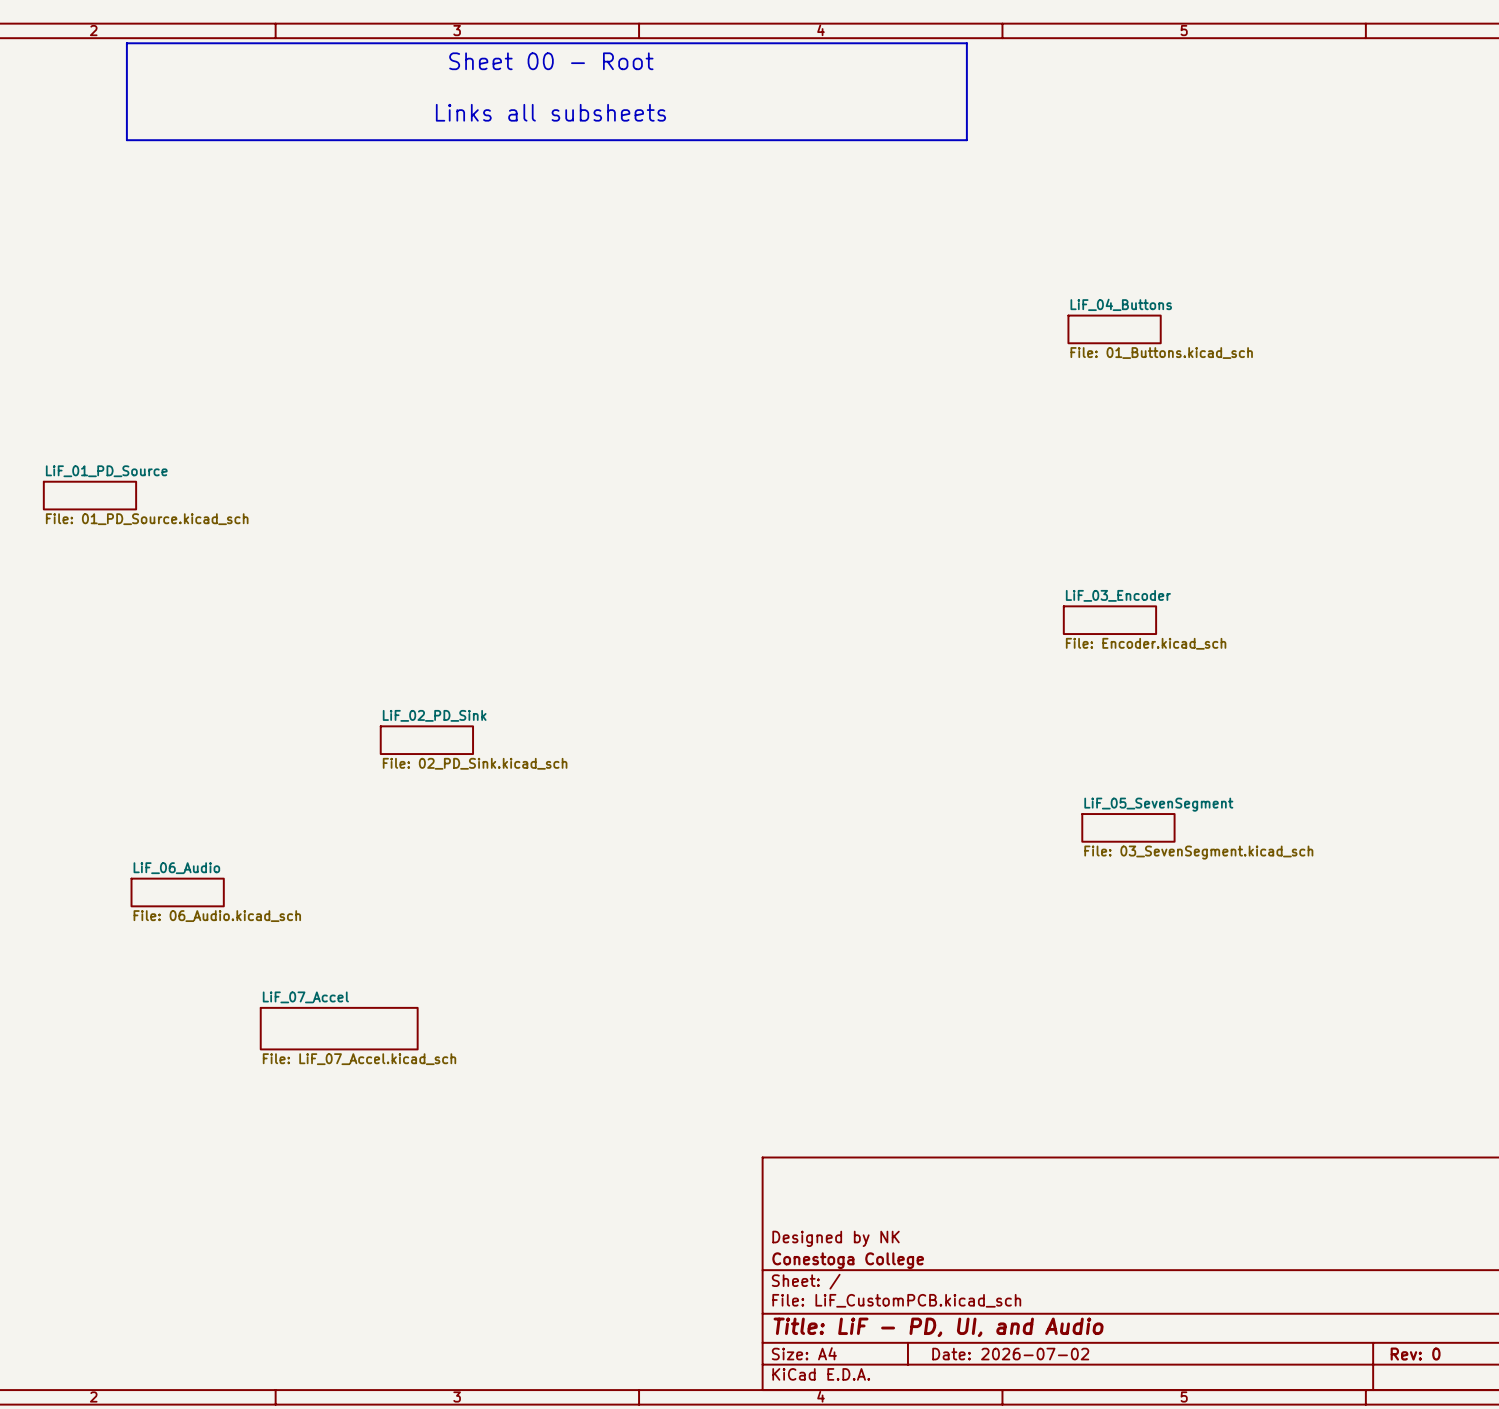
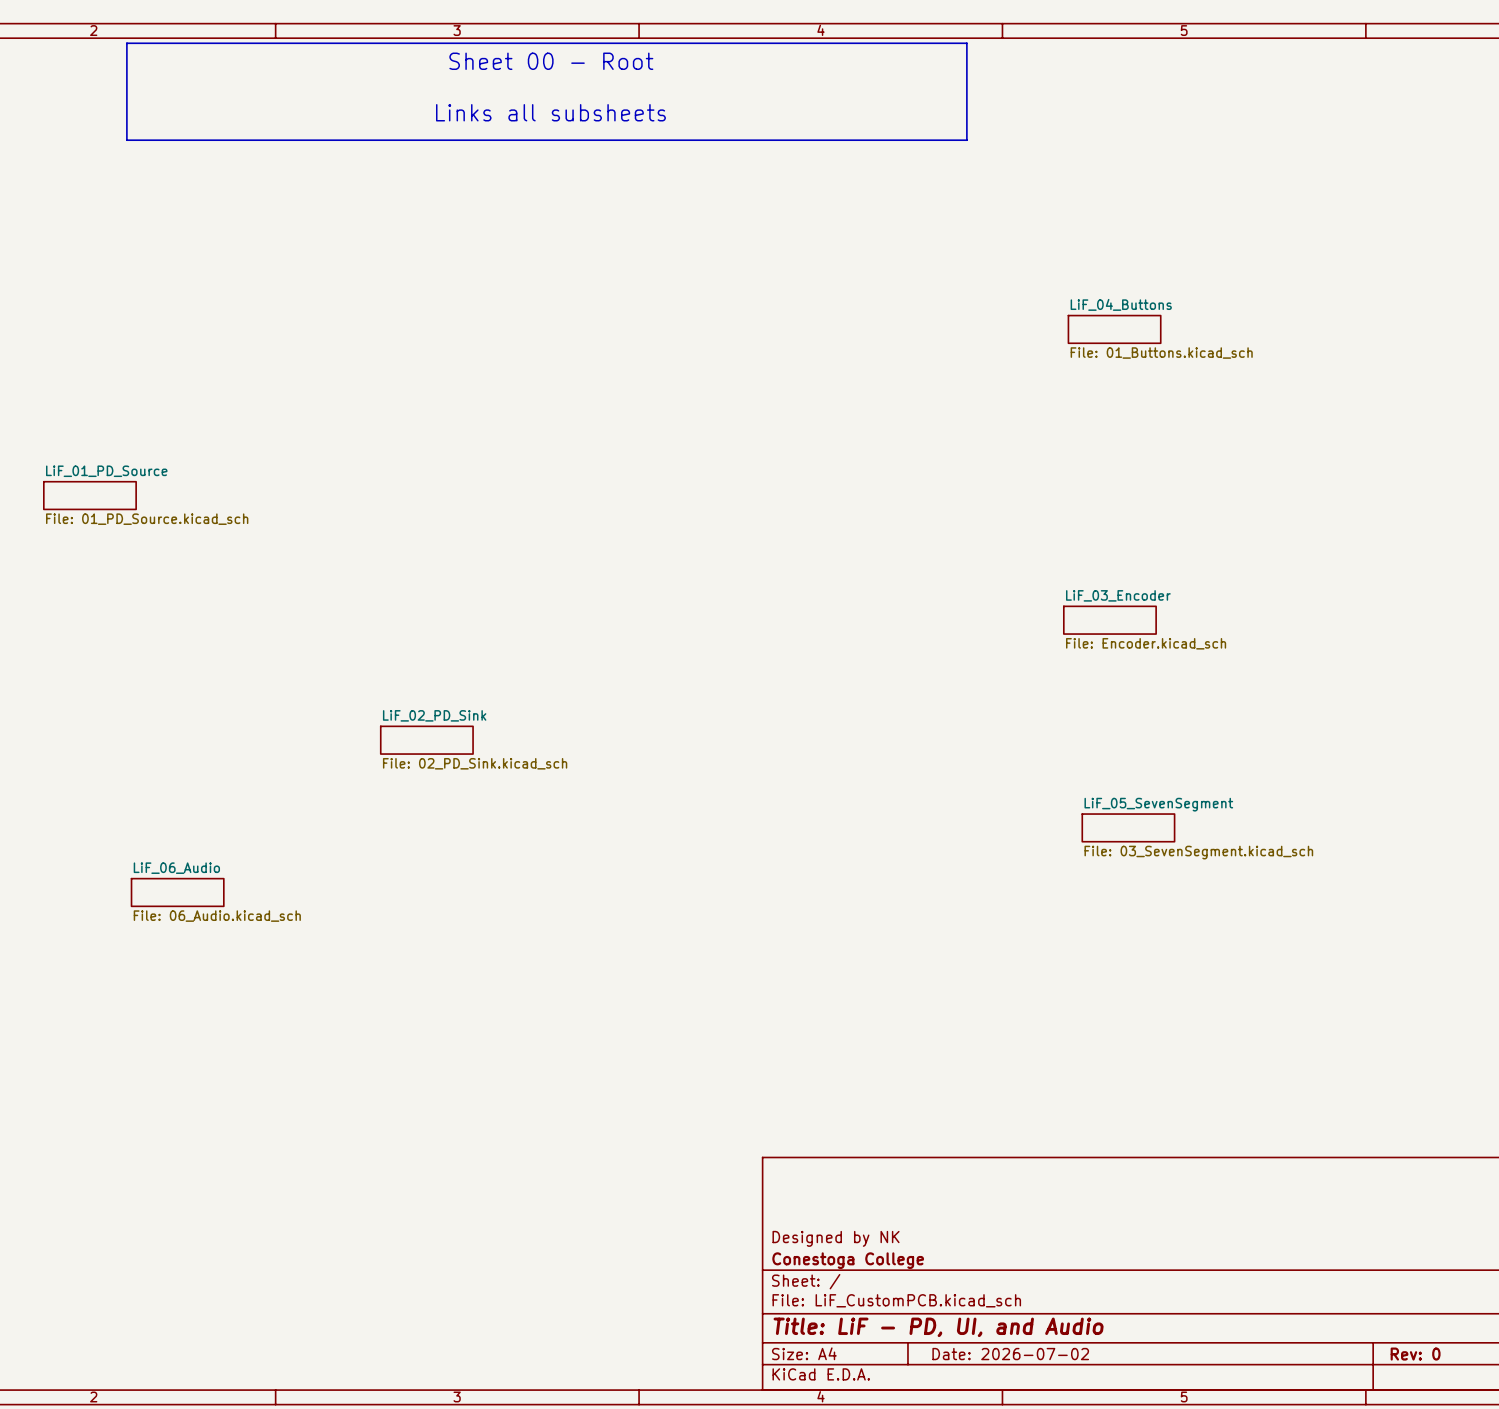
sheet LiF_07_Accel: File: LiF_07_Accel.kicad_sch (339, 1028) -> none

